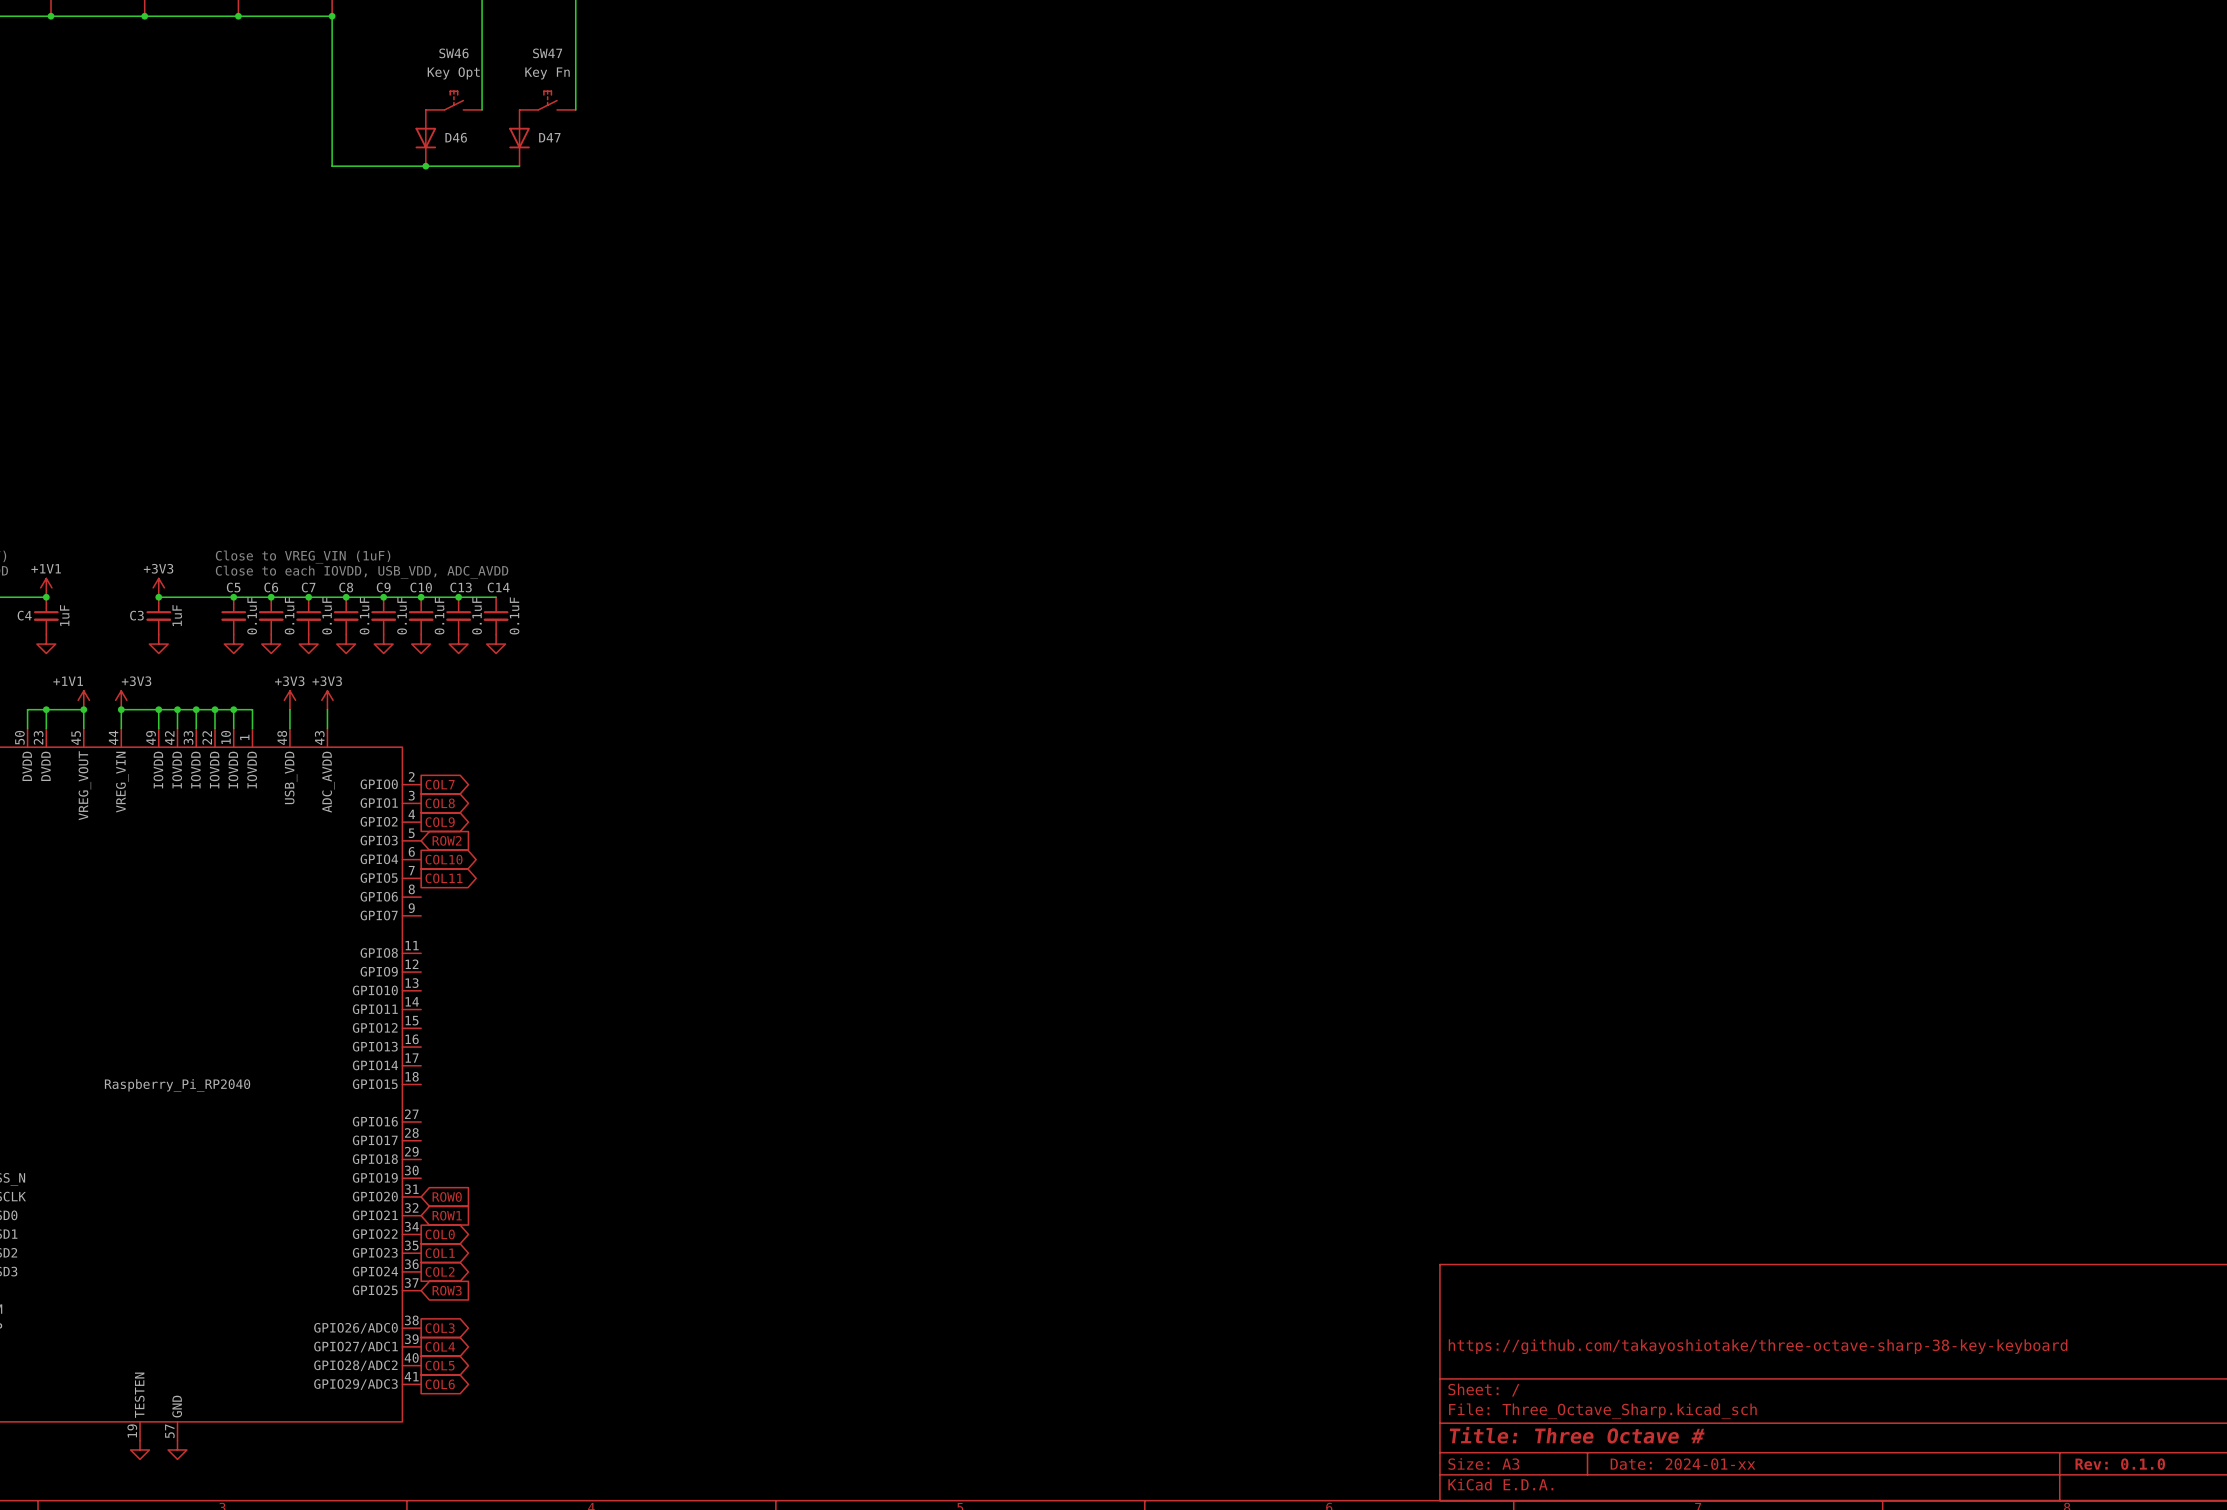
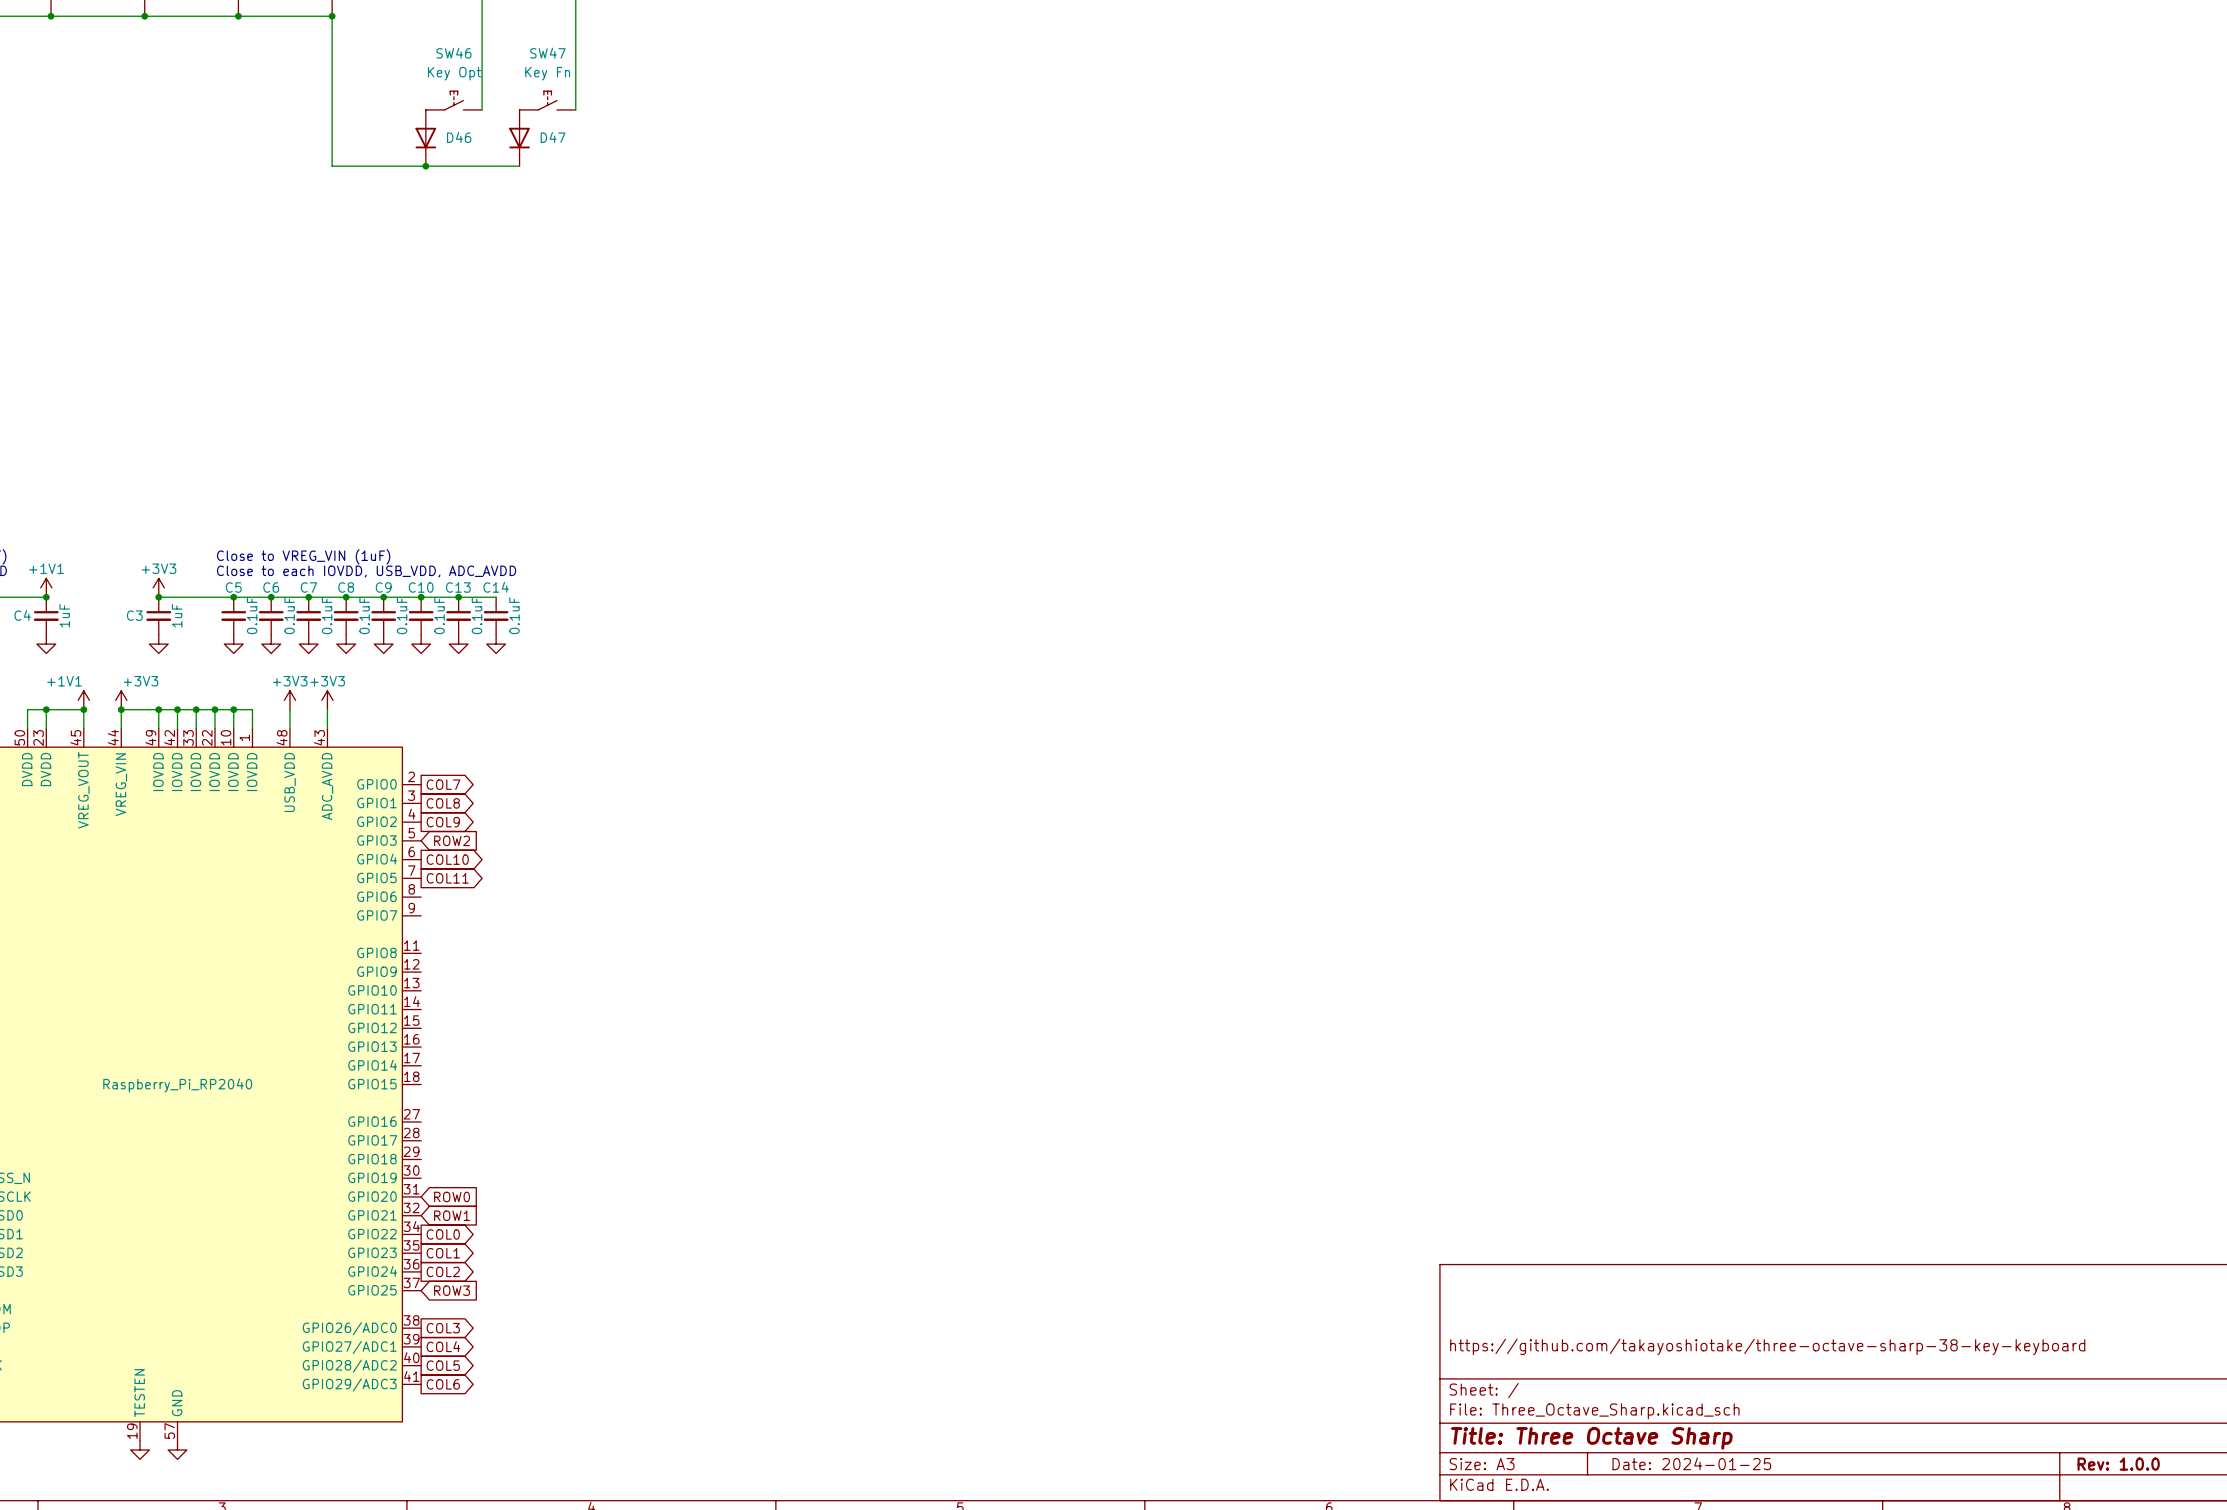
title block: Title: Three Octave # (1577, 1435) -> Title: Three Octave Sharp (1591, 1438)
title block: Date: 2024-01-xx (1683, 1464) -> Date: 2024-01-25 (1691, 1463)
title block: Rev: 0.1.0 (2120, 1464) -> Rev: 1.0.0 (2118, 1464)

